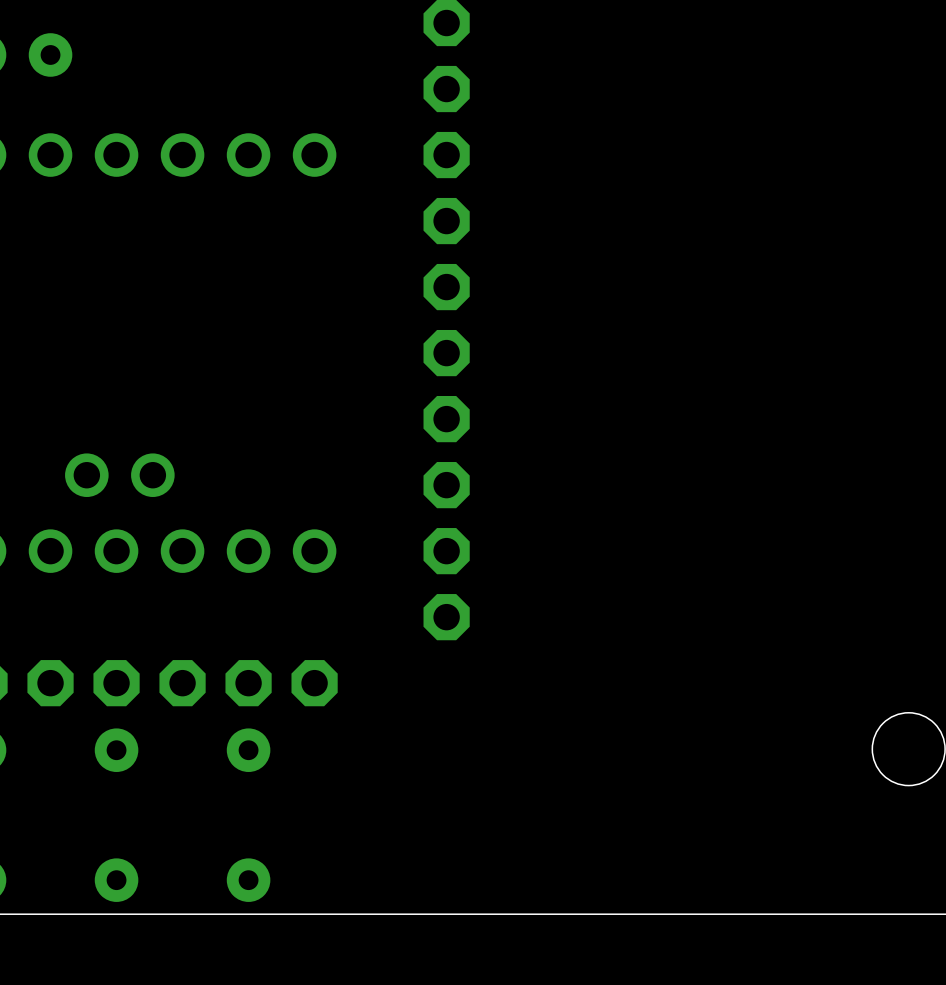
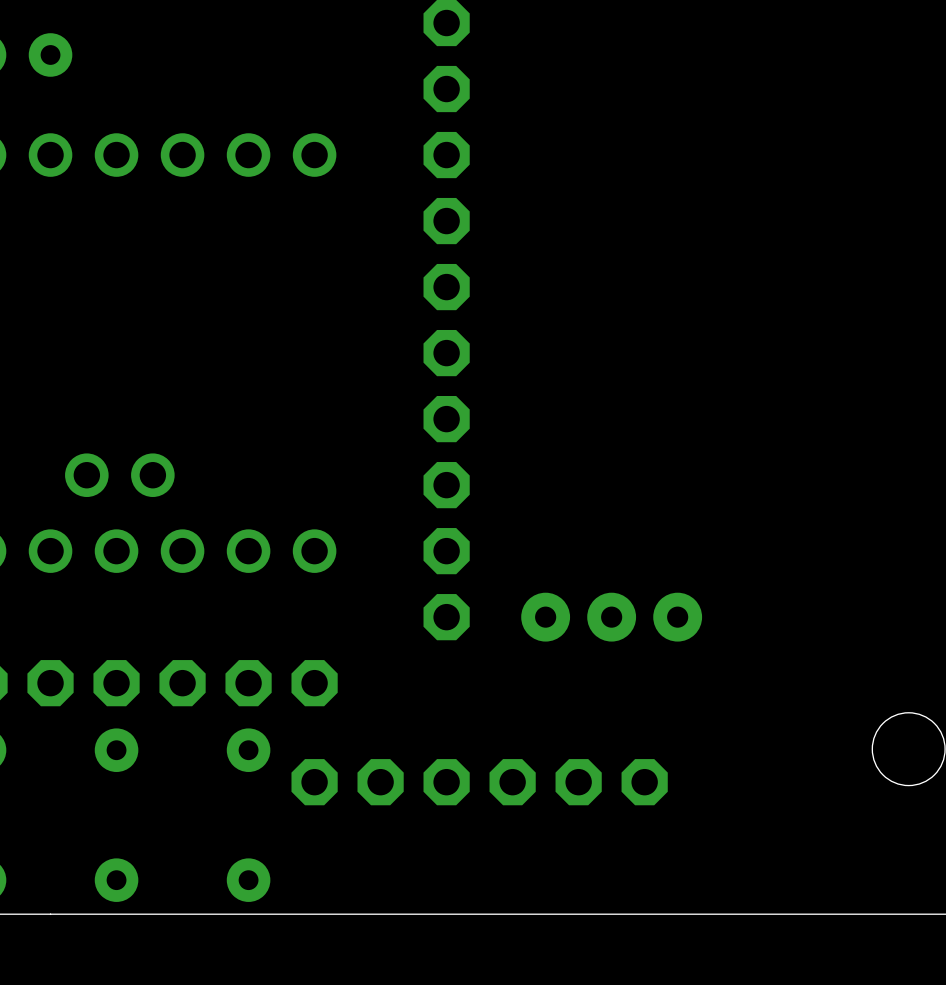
part: none -> (611, 617)
part: none -> (479, 782)

